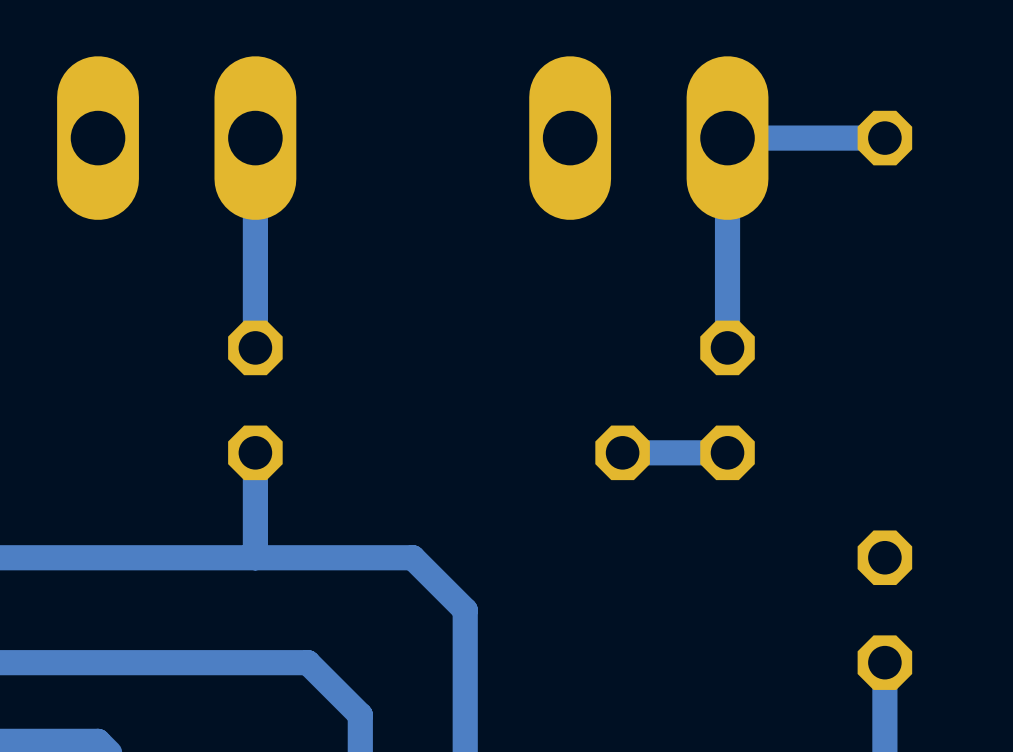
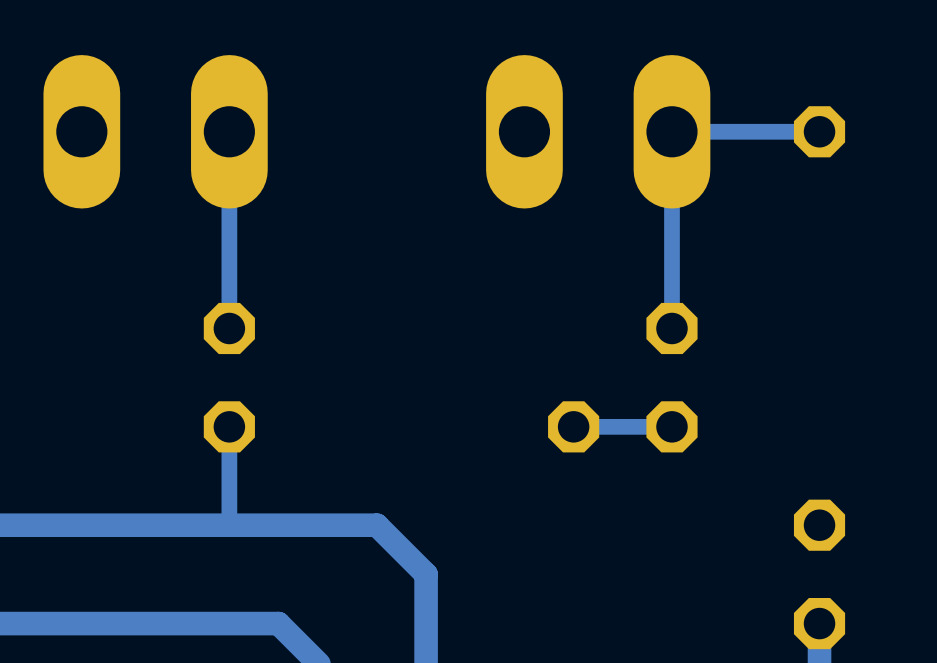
track width: thick (255, 138) (255, 347) -> thin (229, 131) (229, 328)
track width: thick (884, 138) (727, 138) (727, 347) -> thin (819, 131) (671, 131) (671, 328)
track width: thick (255, 452) (255, 557) -> thin (229, 426) (229, 525)
track width: thick (727, 452) (622, 452) -> thin (671, 426) (573, 426)

